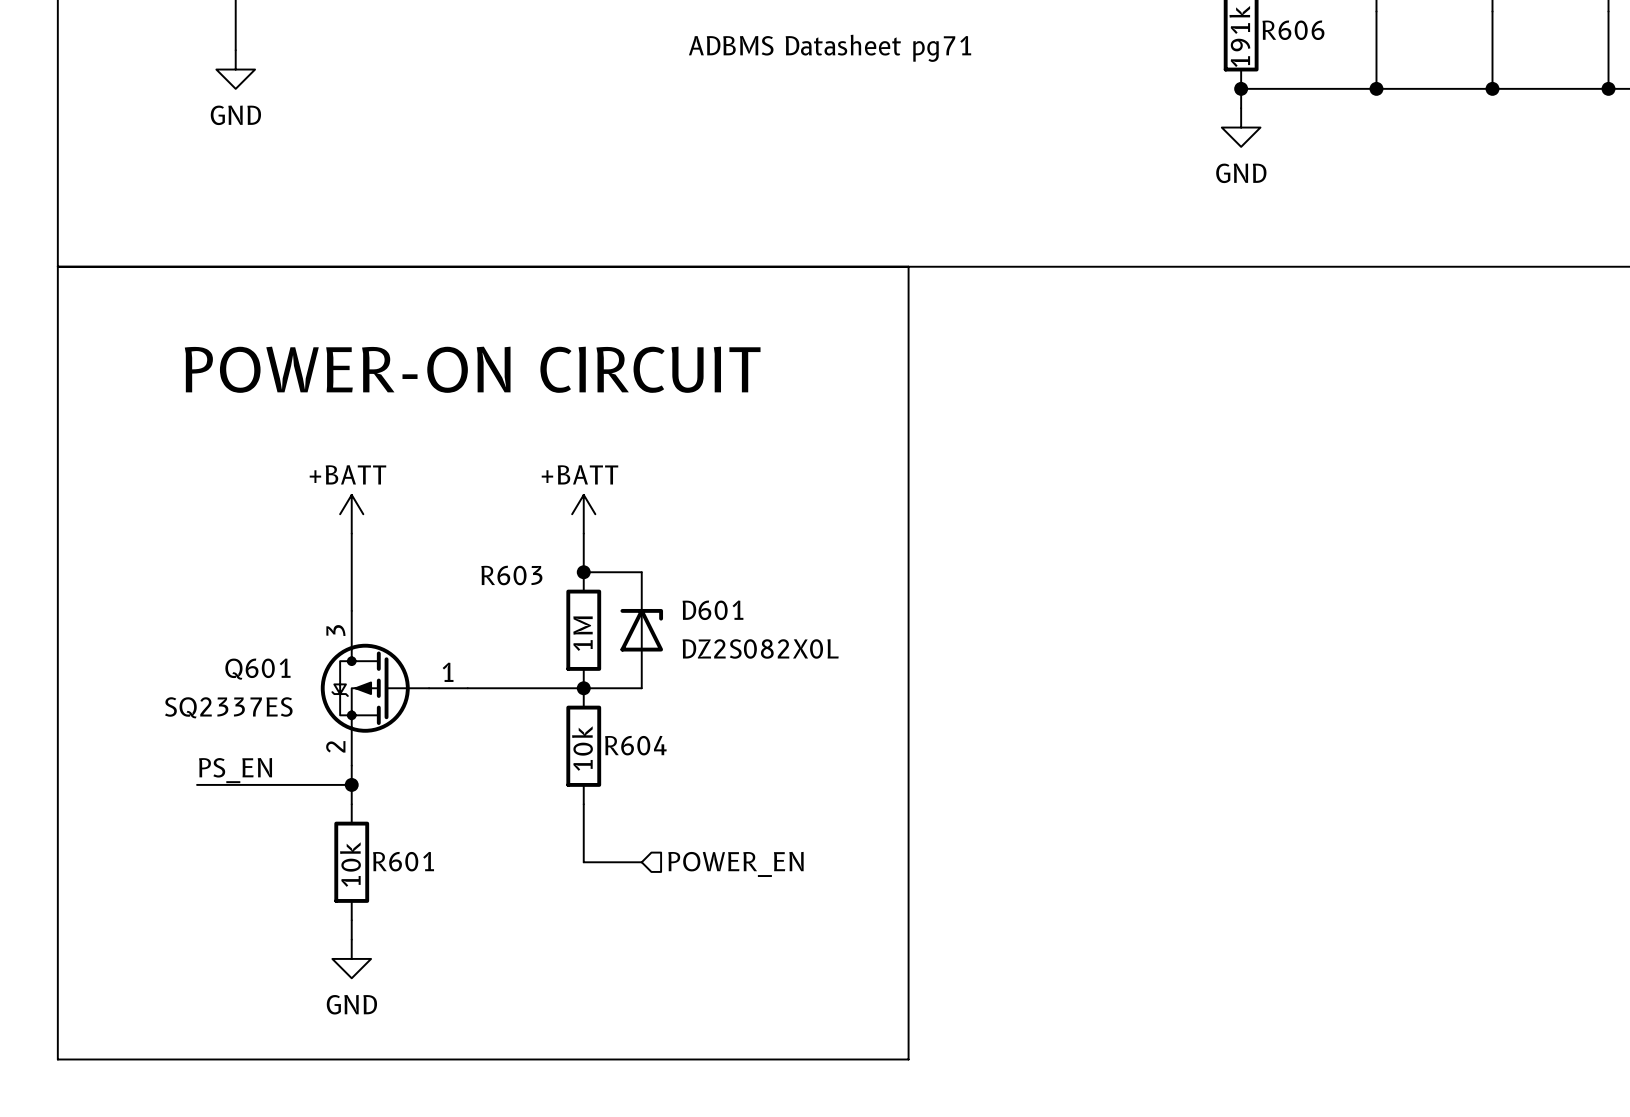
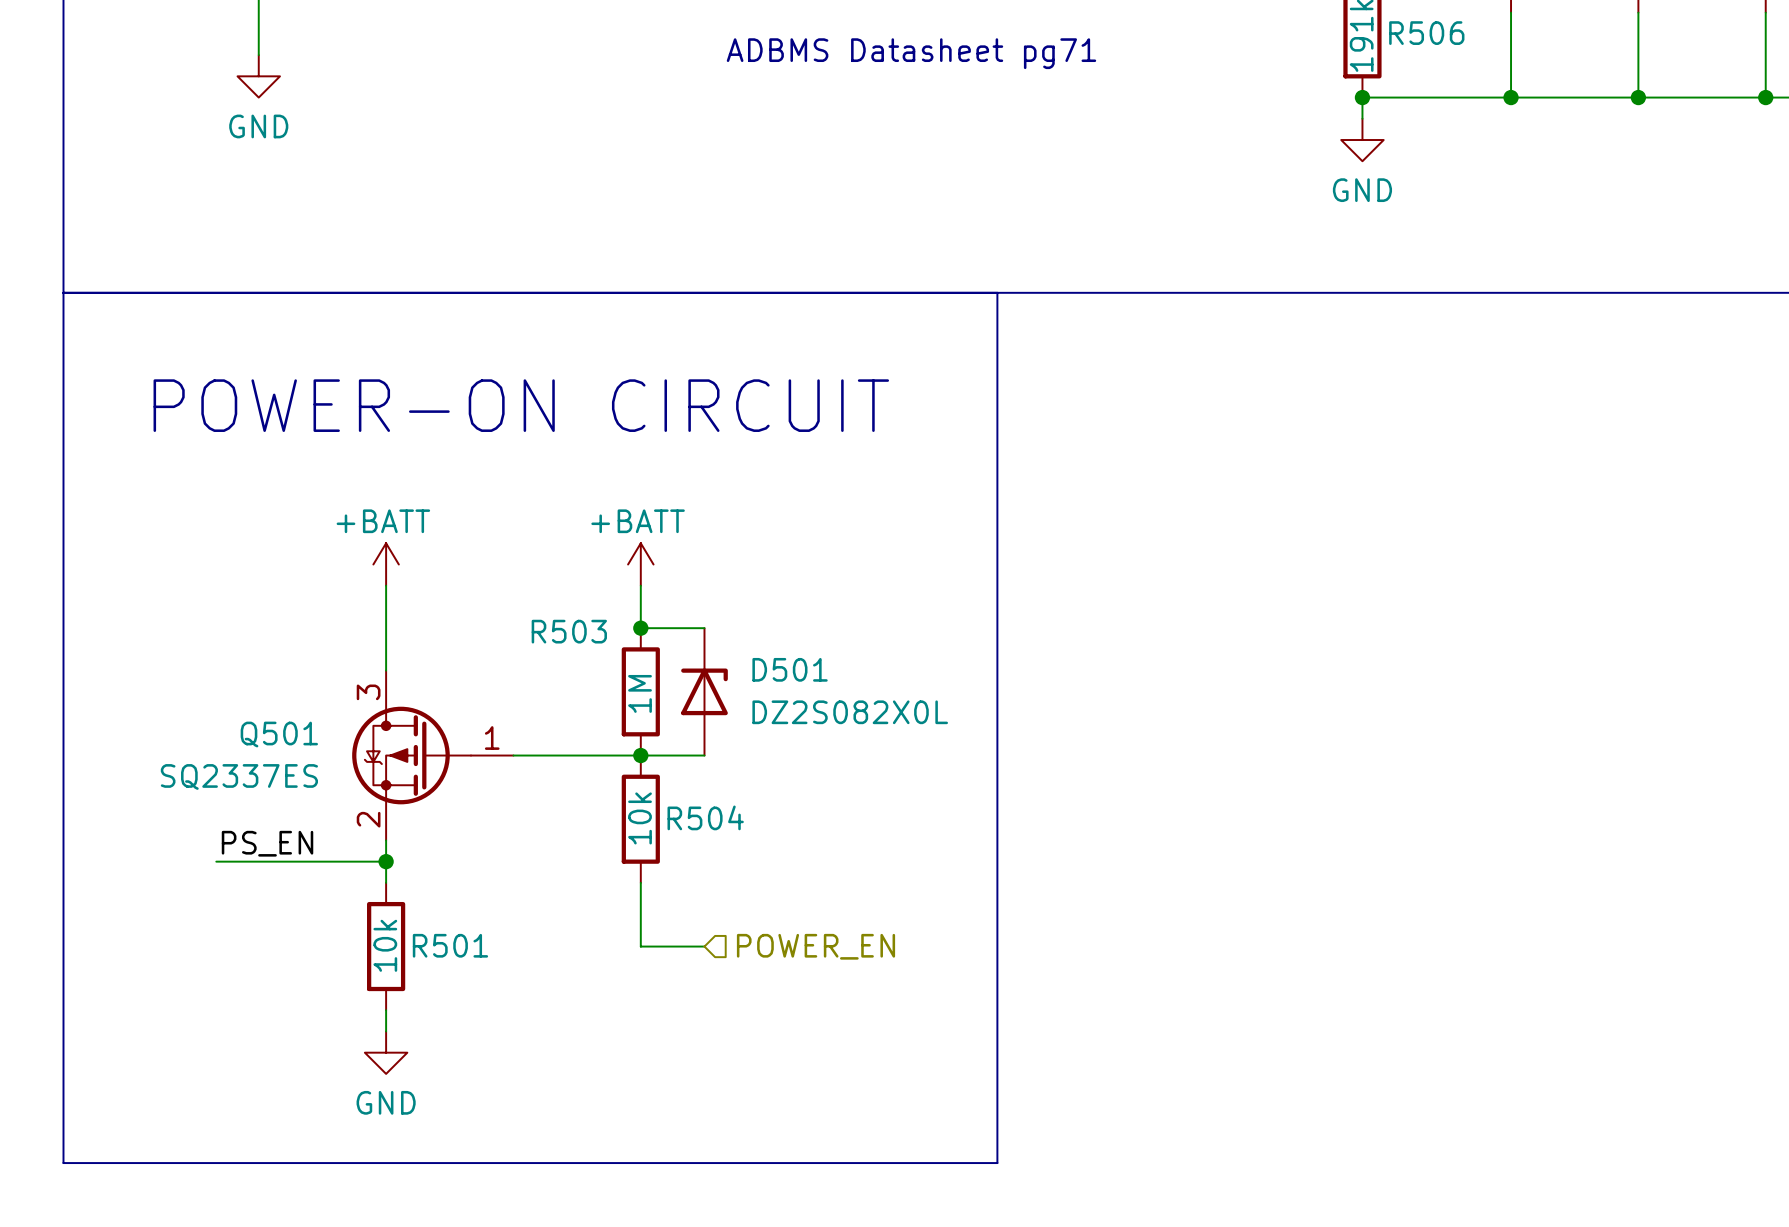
R606 name: R606 (1293, 30) -> R506 (1426, 33)
R603 name: R603 (511, 575) -> R503 (569, 631)
D601 name: D601 (712, 610) -> D501 (790, 669)
Q601 name: Q601 (257, 669) -> Q501 (279, 734)
R604 name: R604 (635, 745) -> R504 (705, 817)
R601 name: R601 (403, 861) -> R501 (450, 945)

